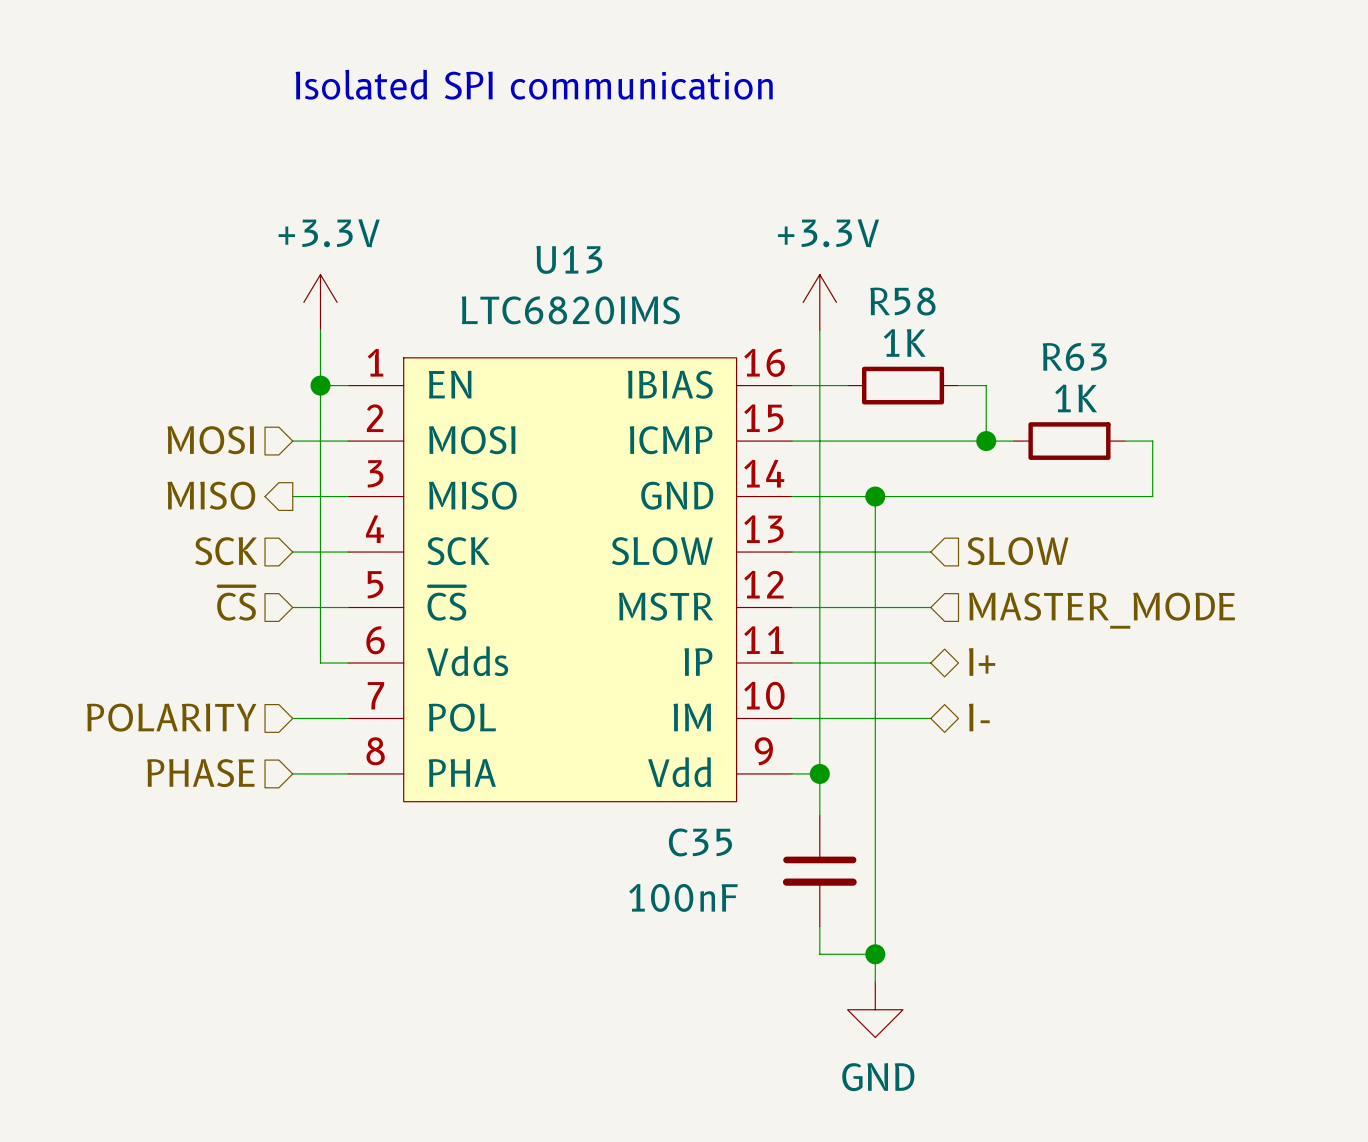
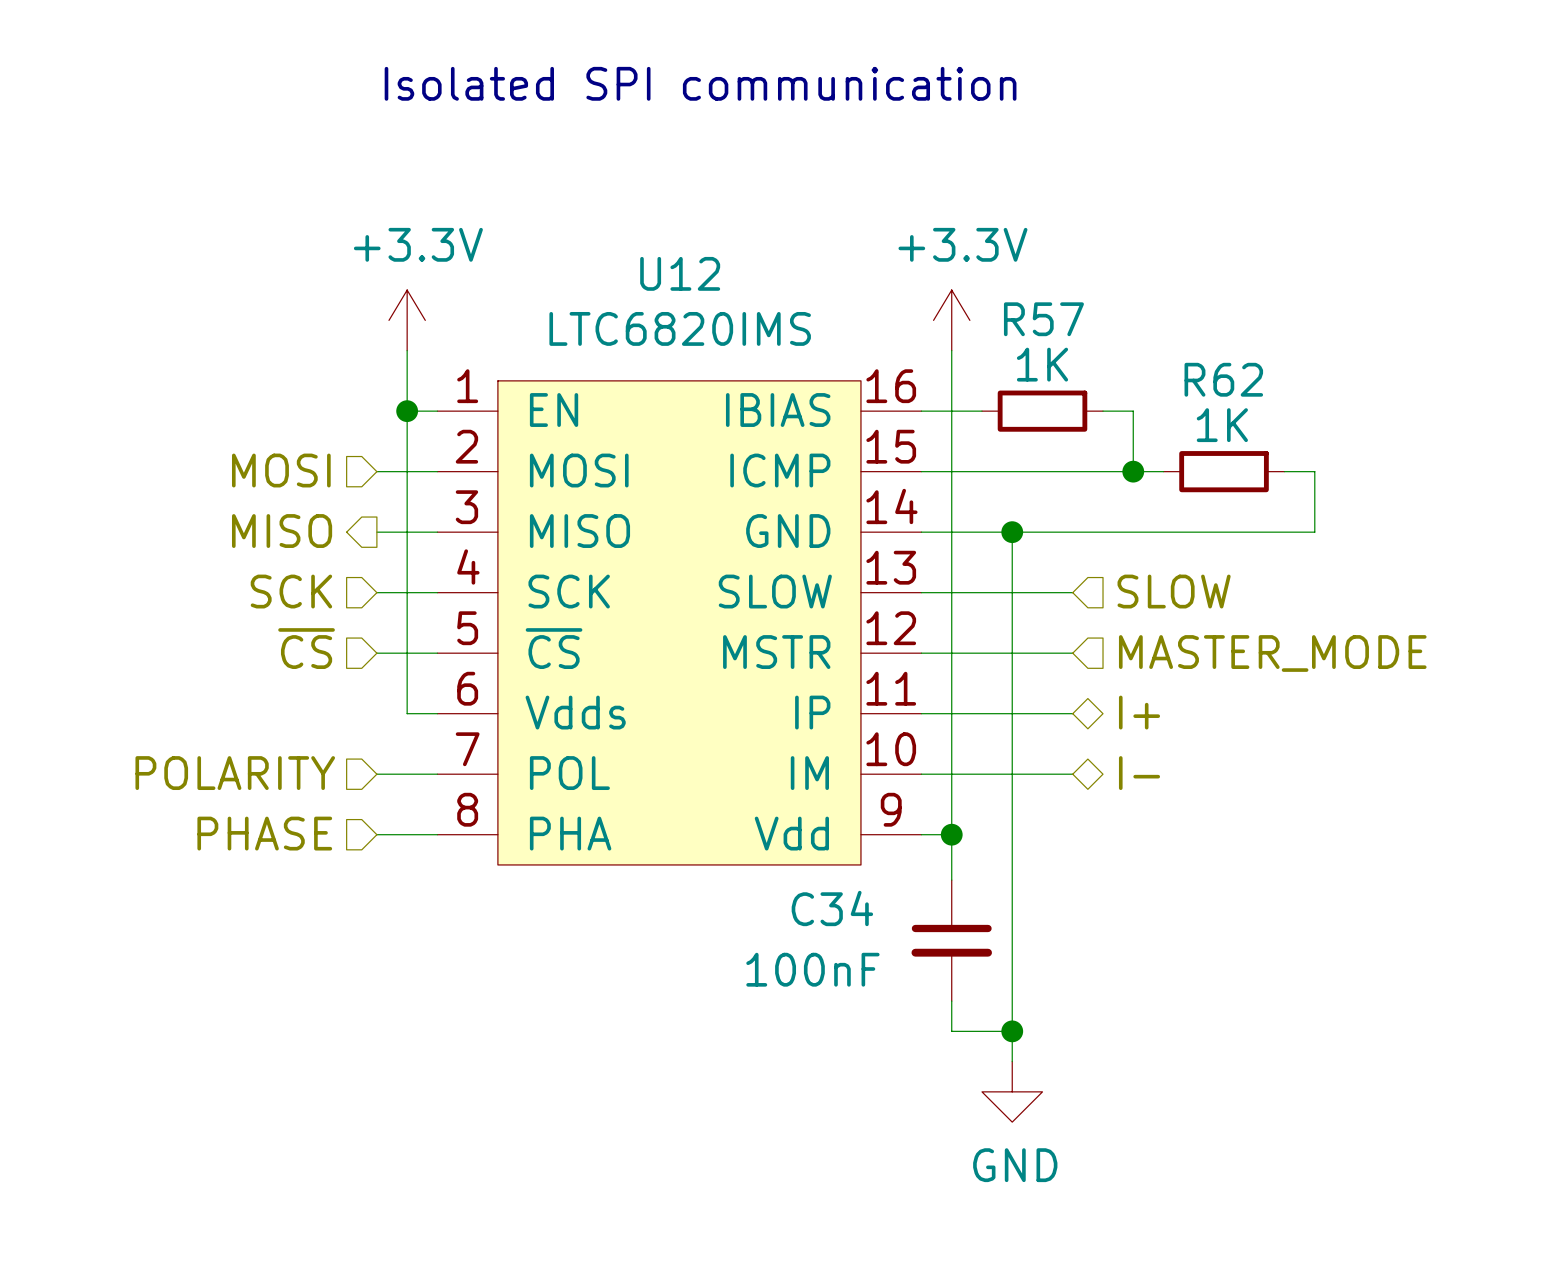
U13 name: U13 (569, 259) -> U12 (680, 273)
R58 name: R58 (902, 301) -> R57 (1043, 319)
R63 name: R63 (1074, 357) -> R62 (1223, 379)
C35 name: C35 (700, 842) -> C34 (832, 908)

